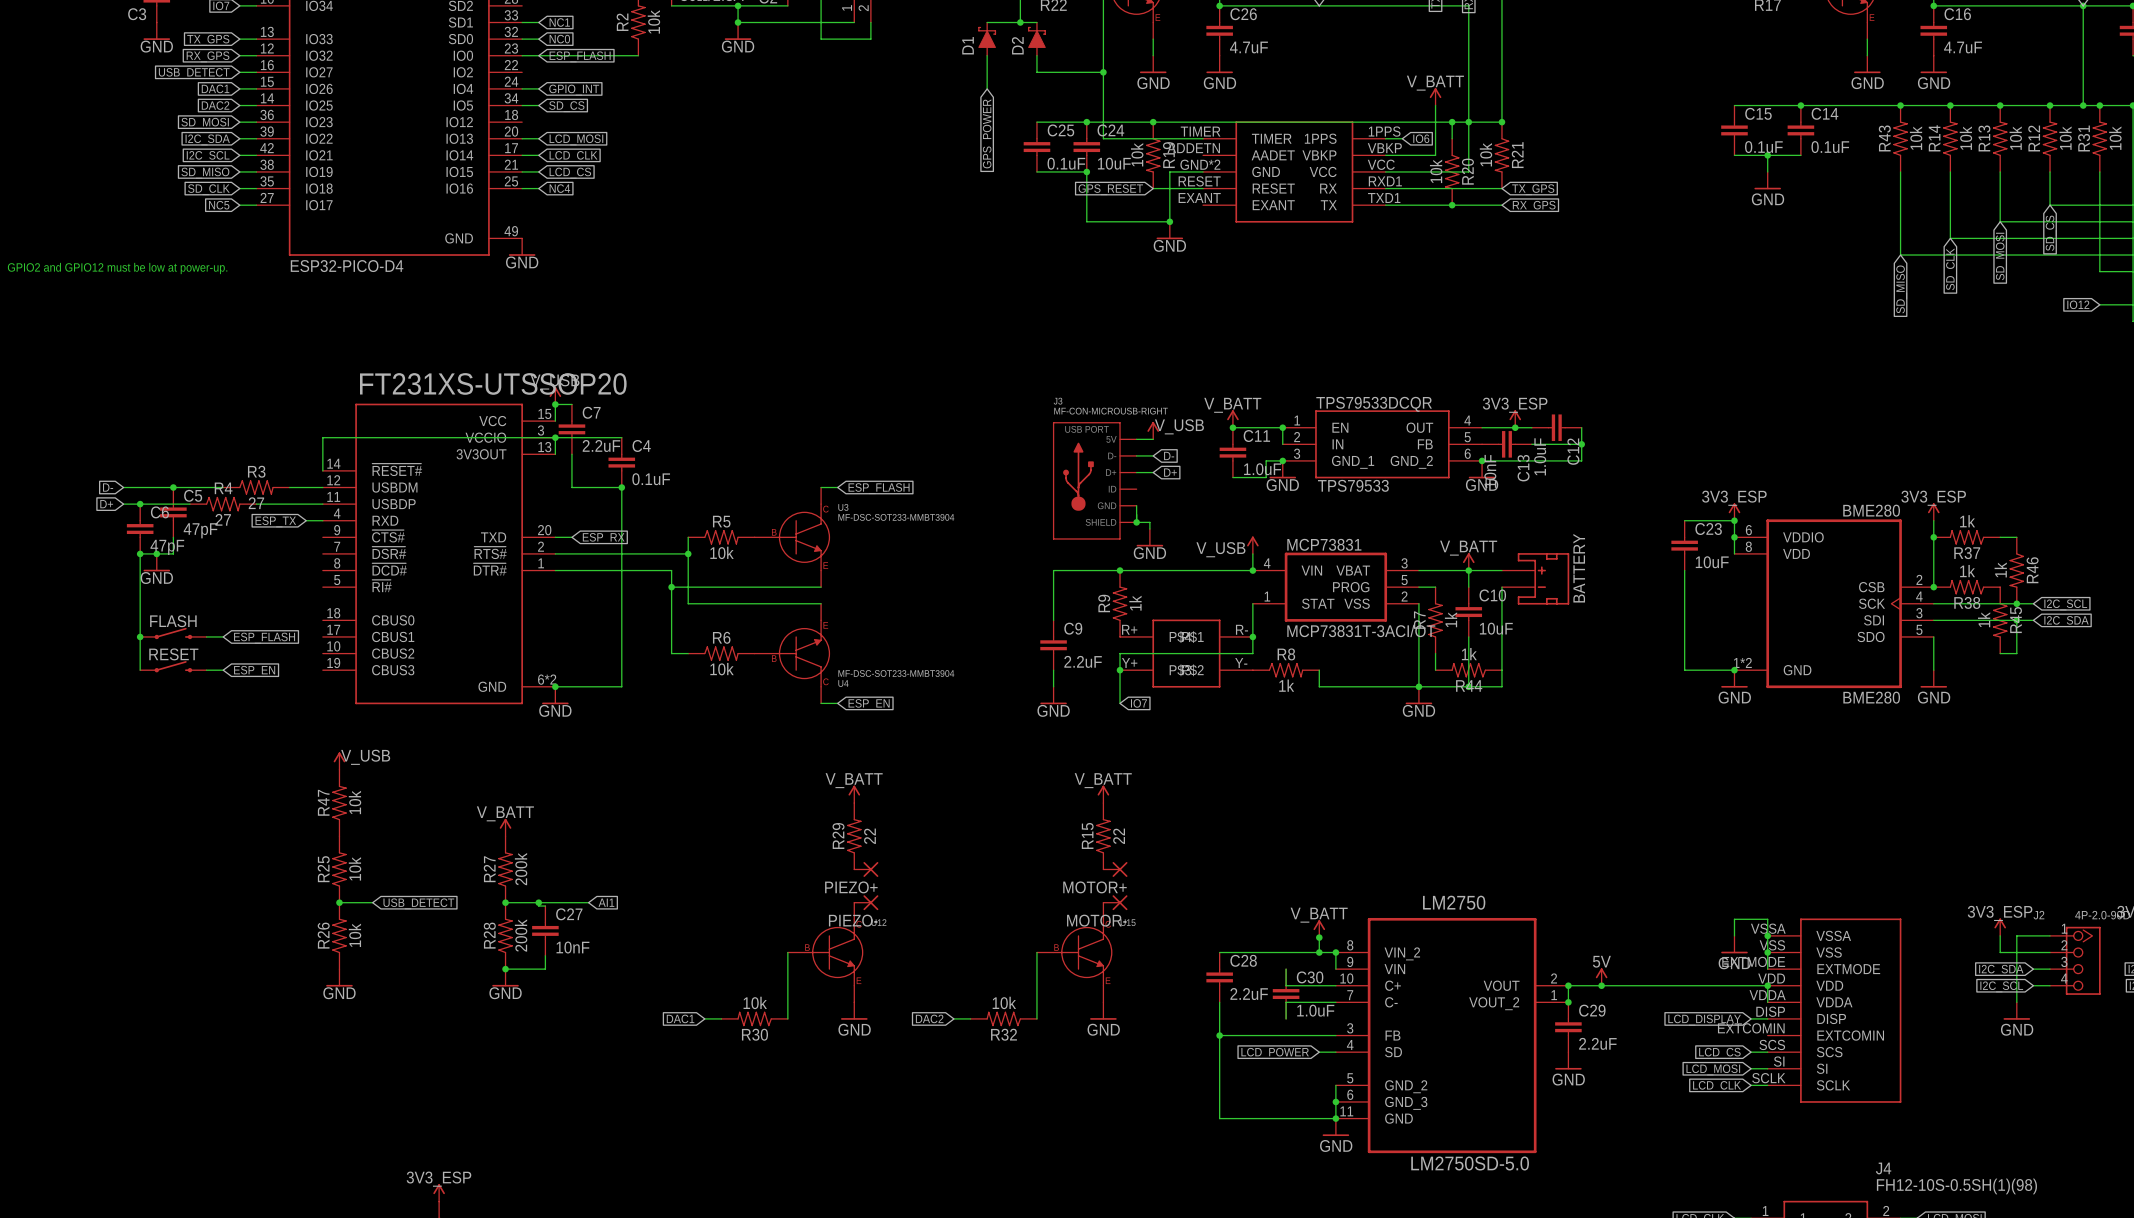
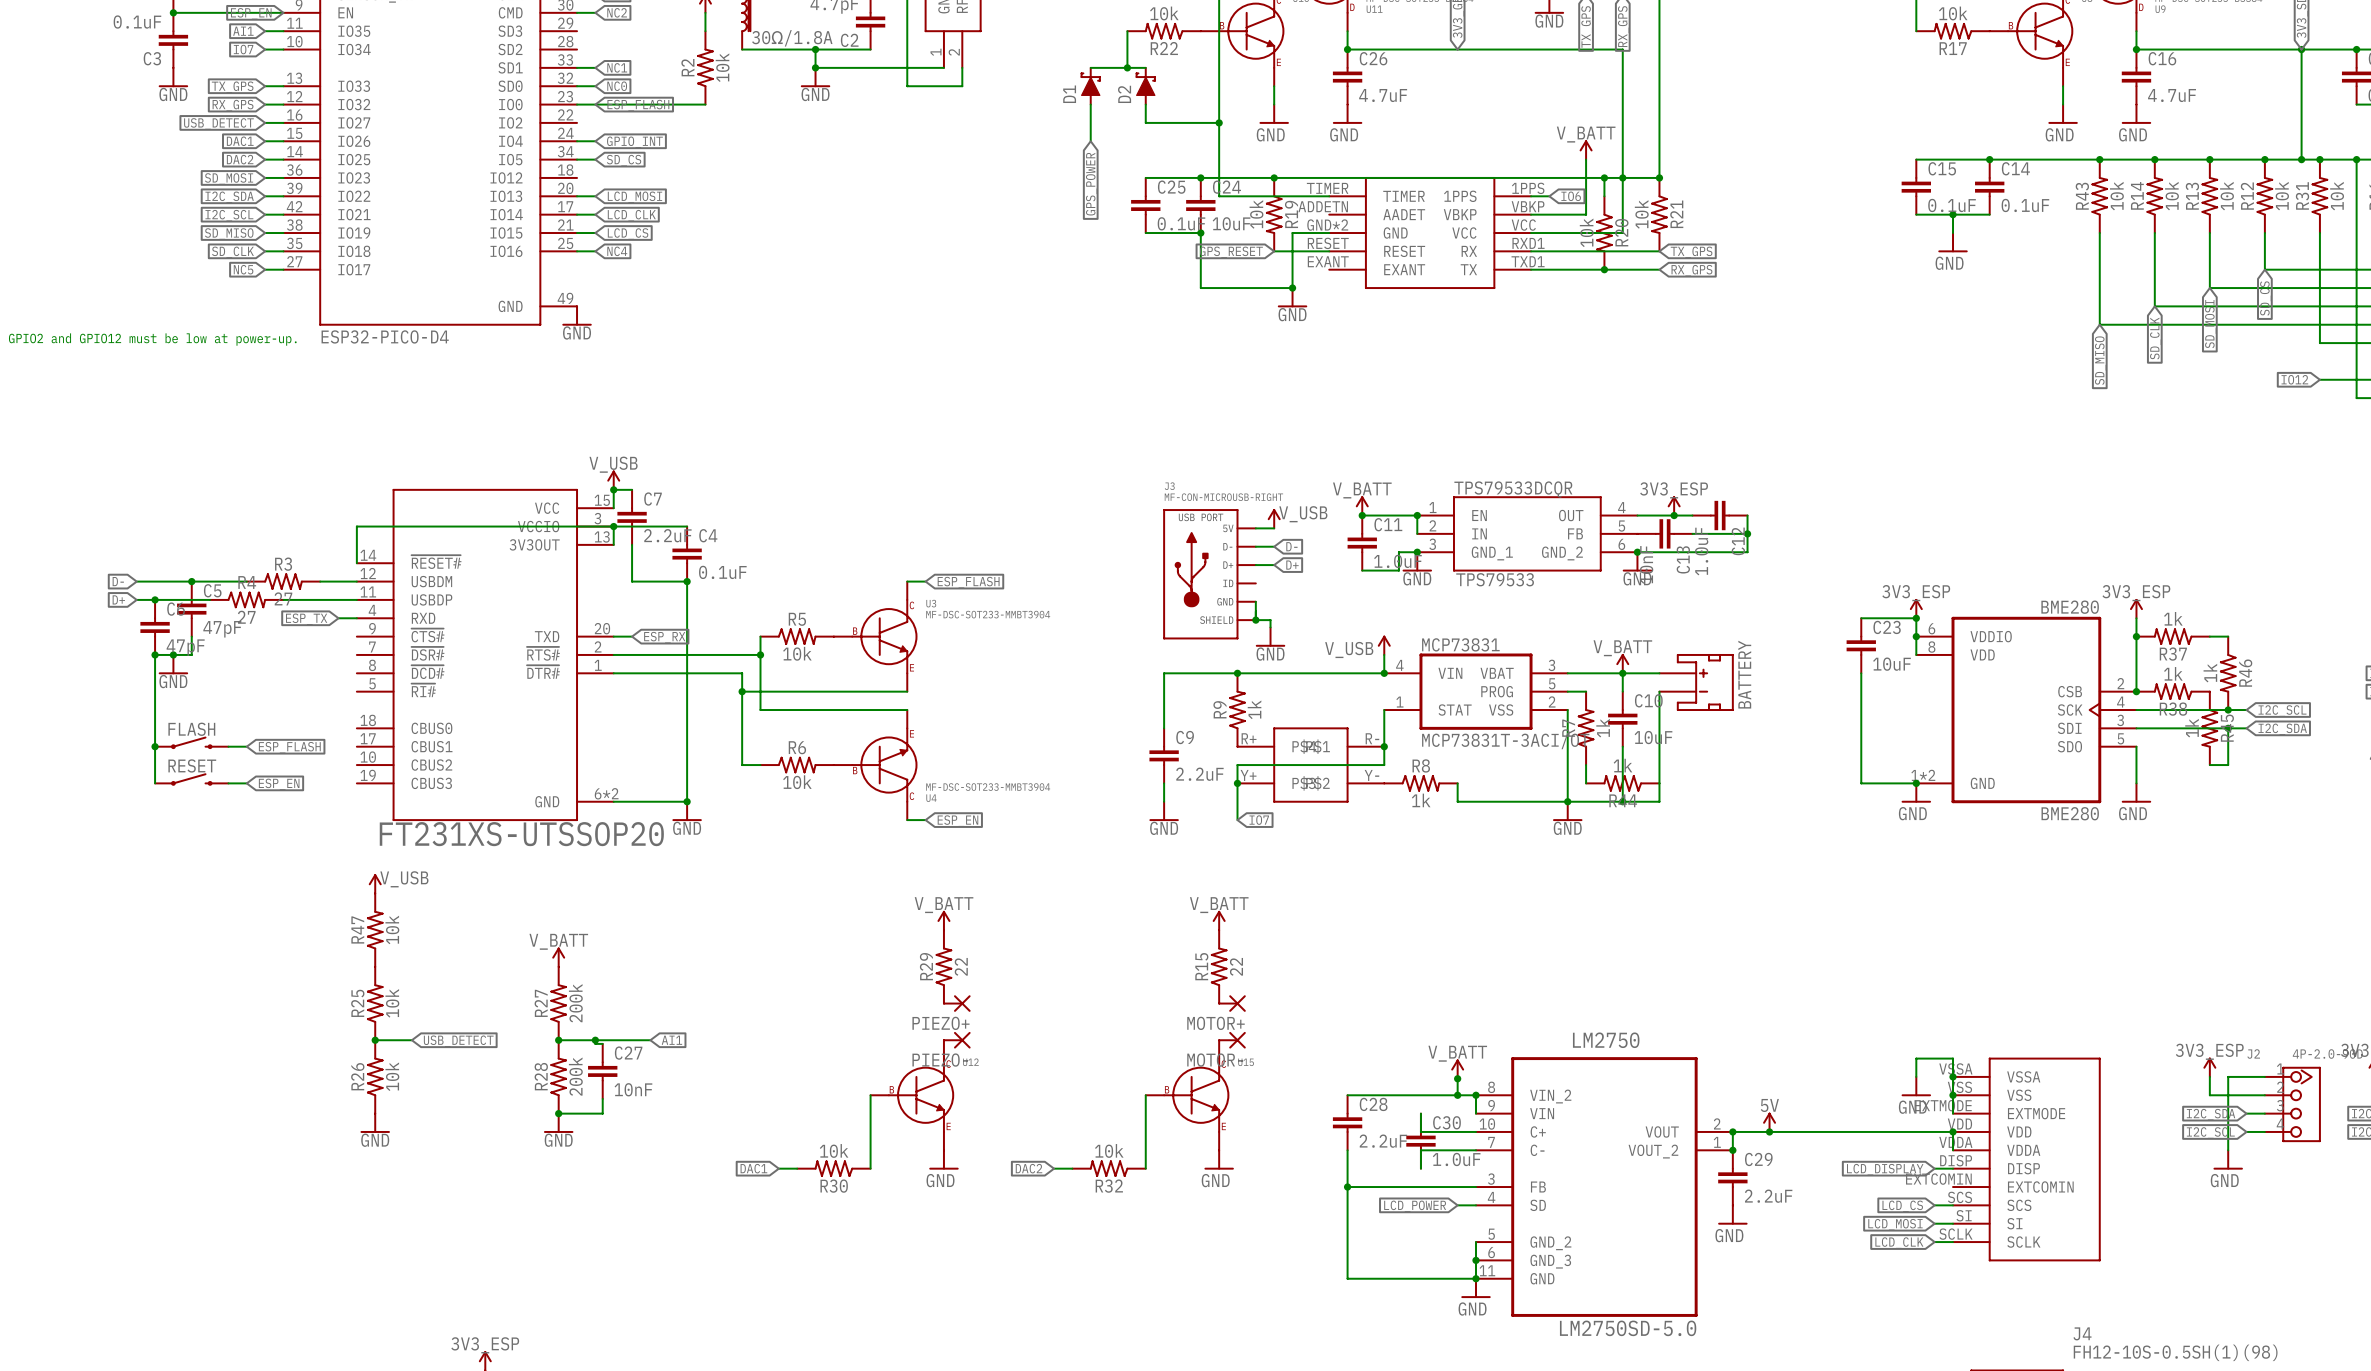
part value position: FT231XS-UTSSOP20 (493, 383) -> FT231XS-UTSSOP20 (521, 834)
junction: (555, 686) -> none
junction: none -> (687, 801)
power symbol position: GND (555, 695) -> GND (687, 811)

